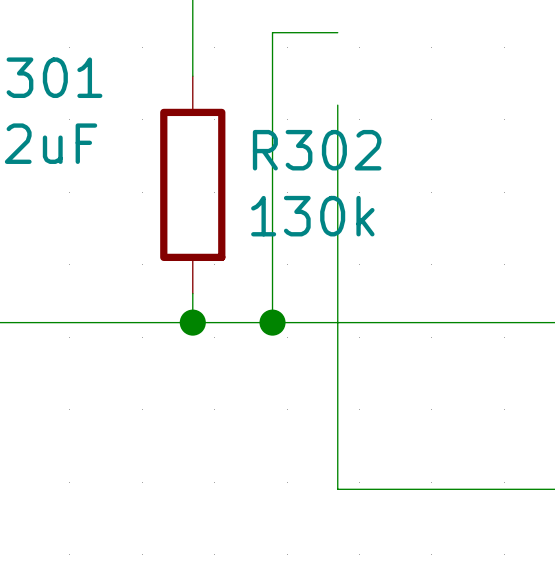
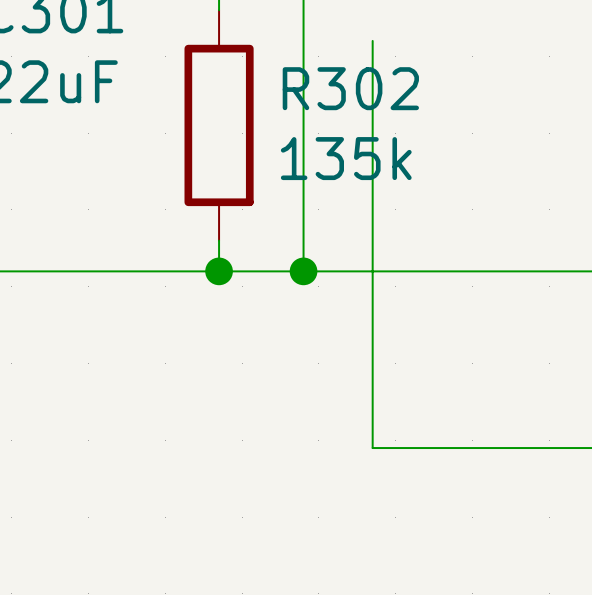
R302 value: 130k (312, 216) -> 135k (346, 158)

